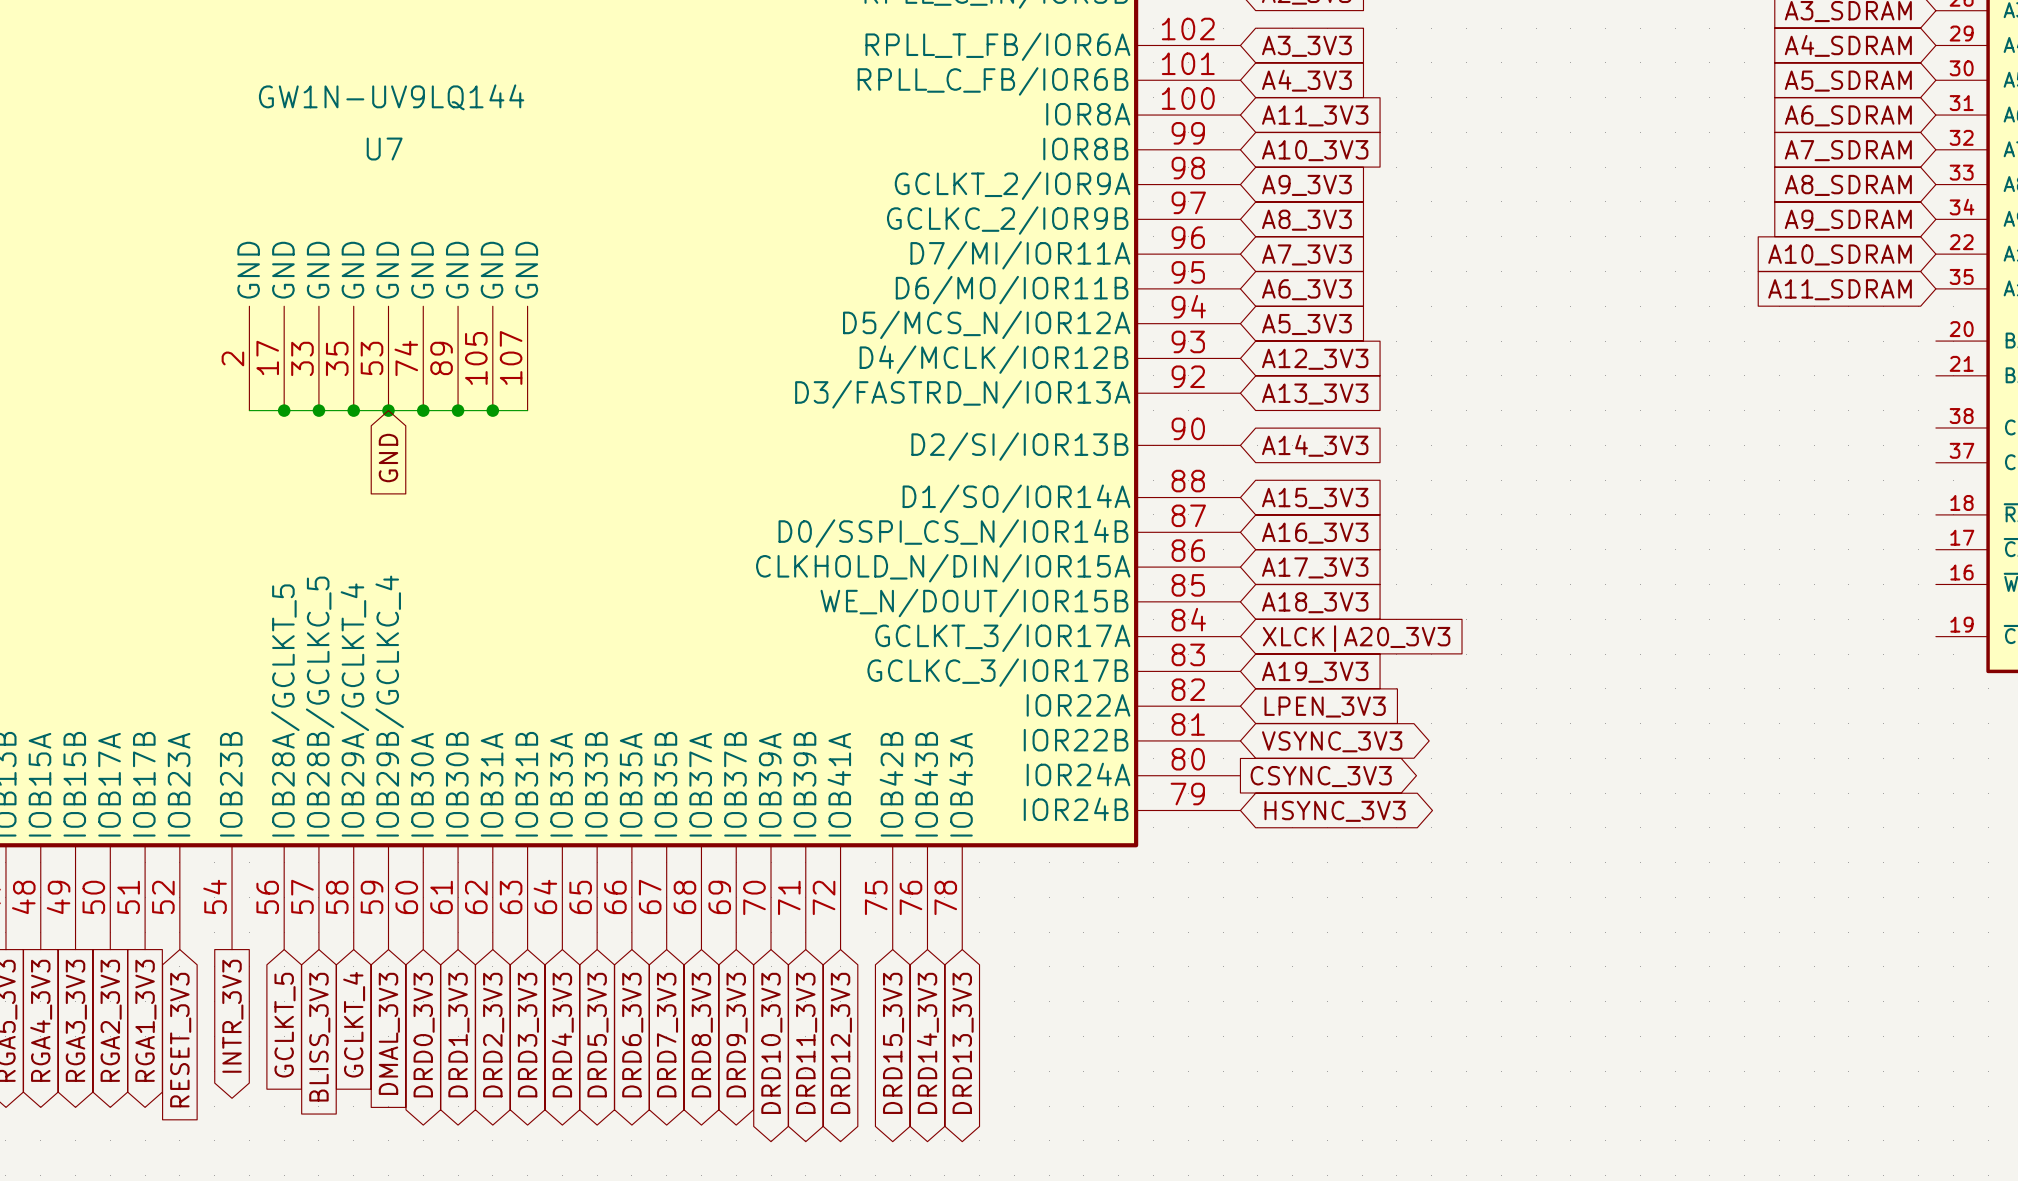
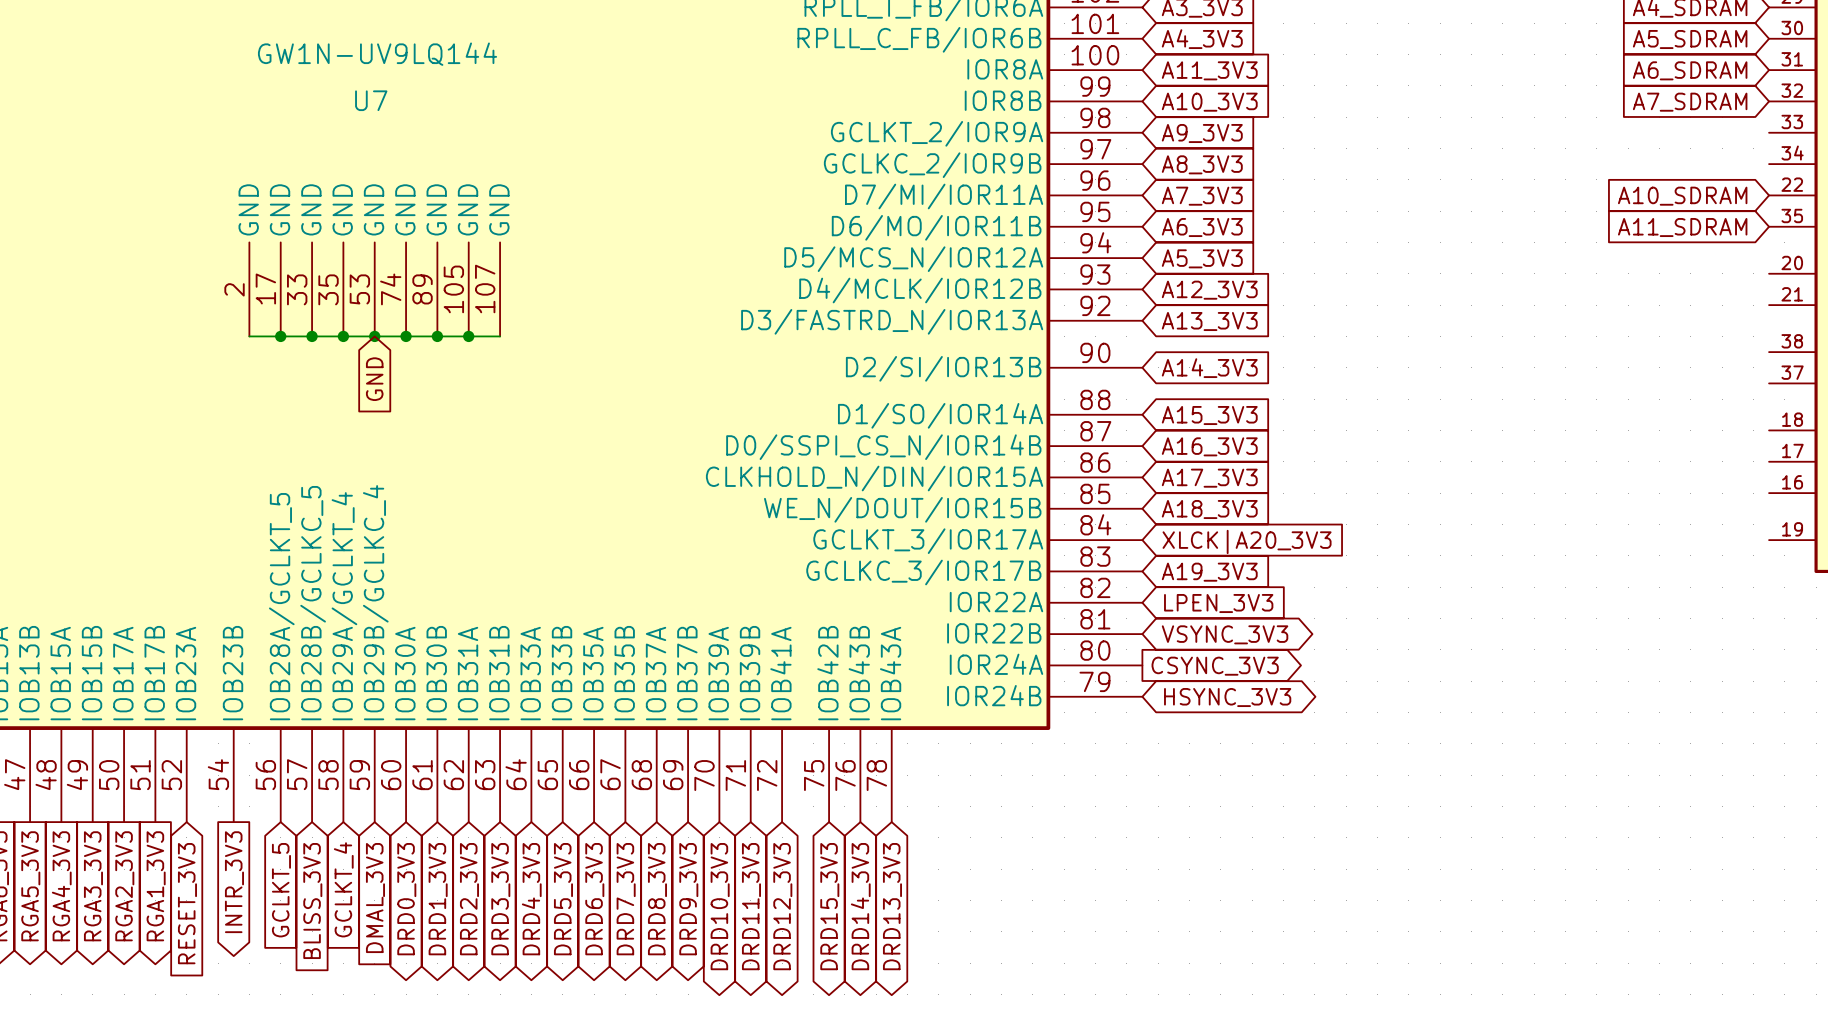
global label: A8_SDRAM (1848, 185) -> none
global label: A9_SDRAM (1848, 220) -> none

